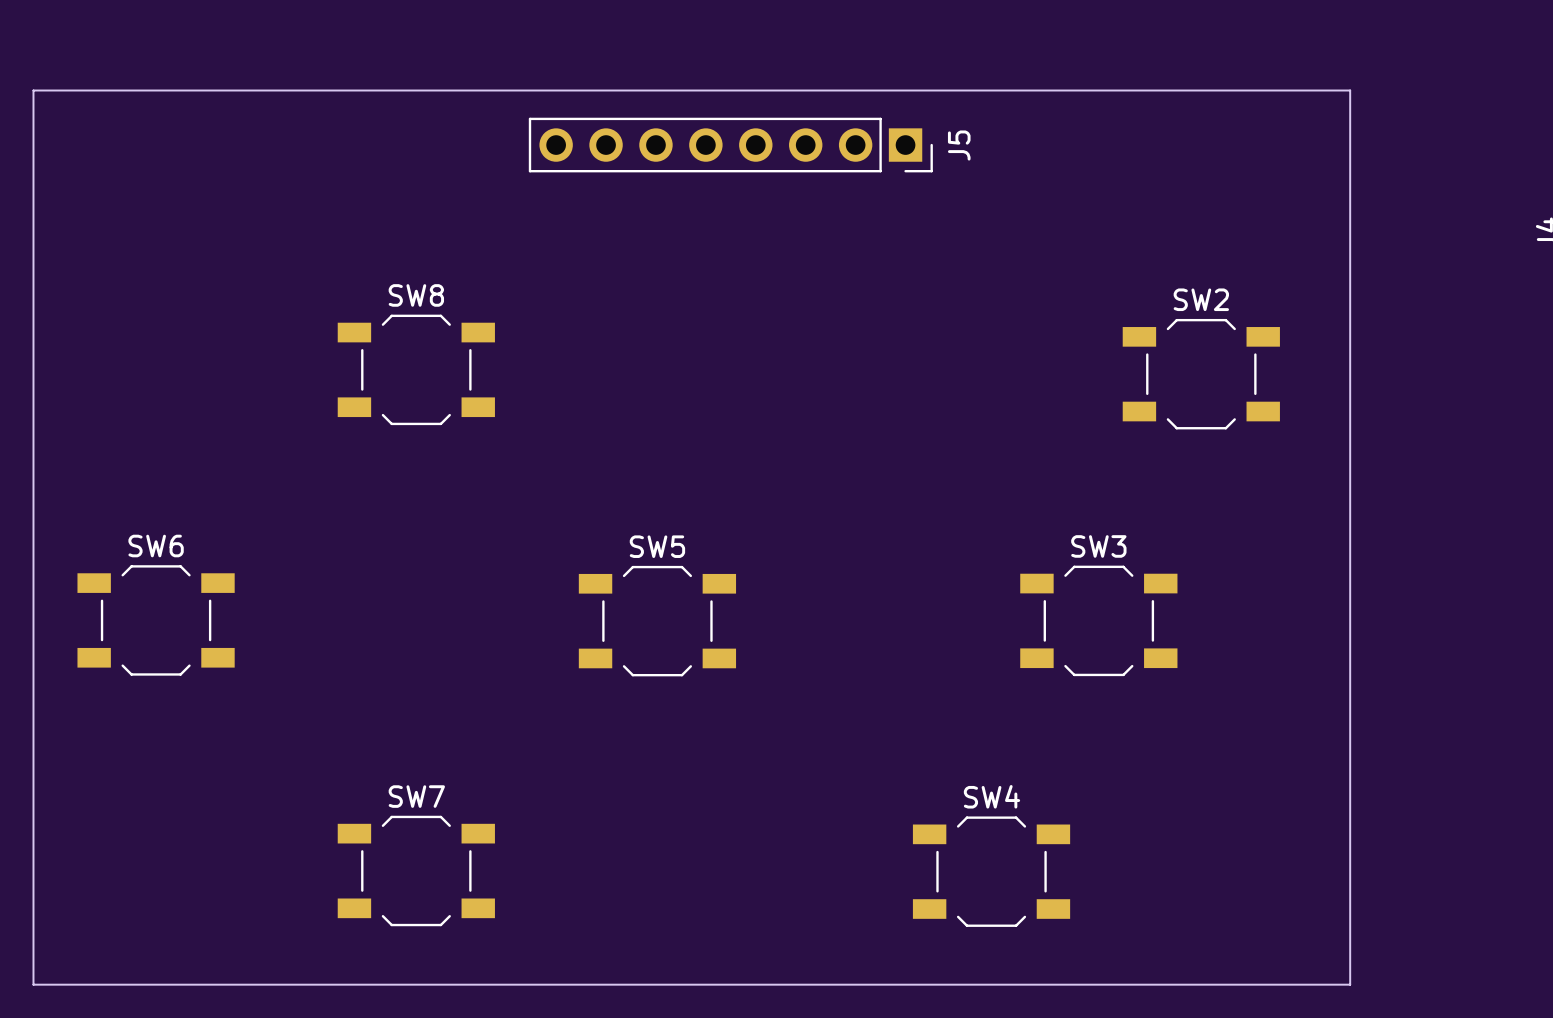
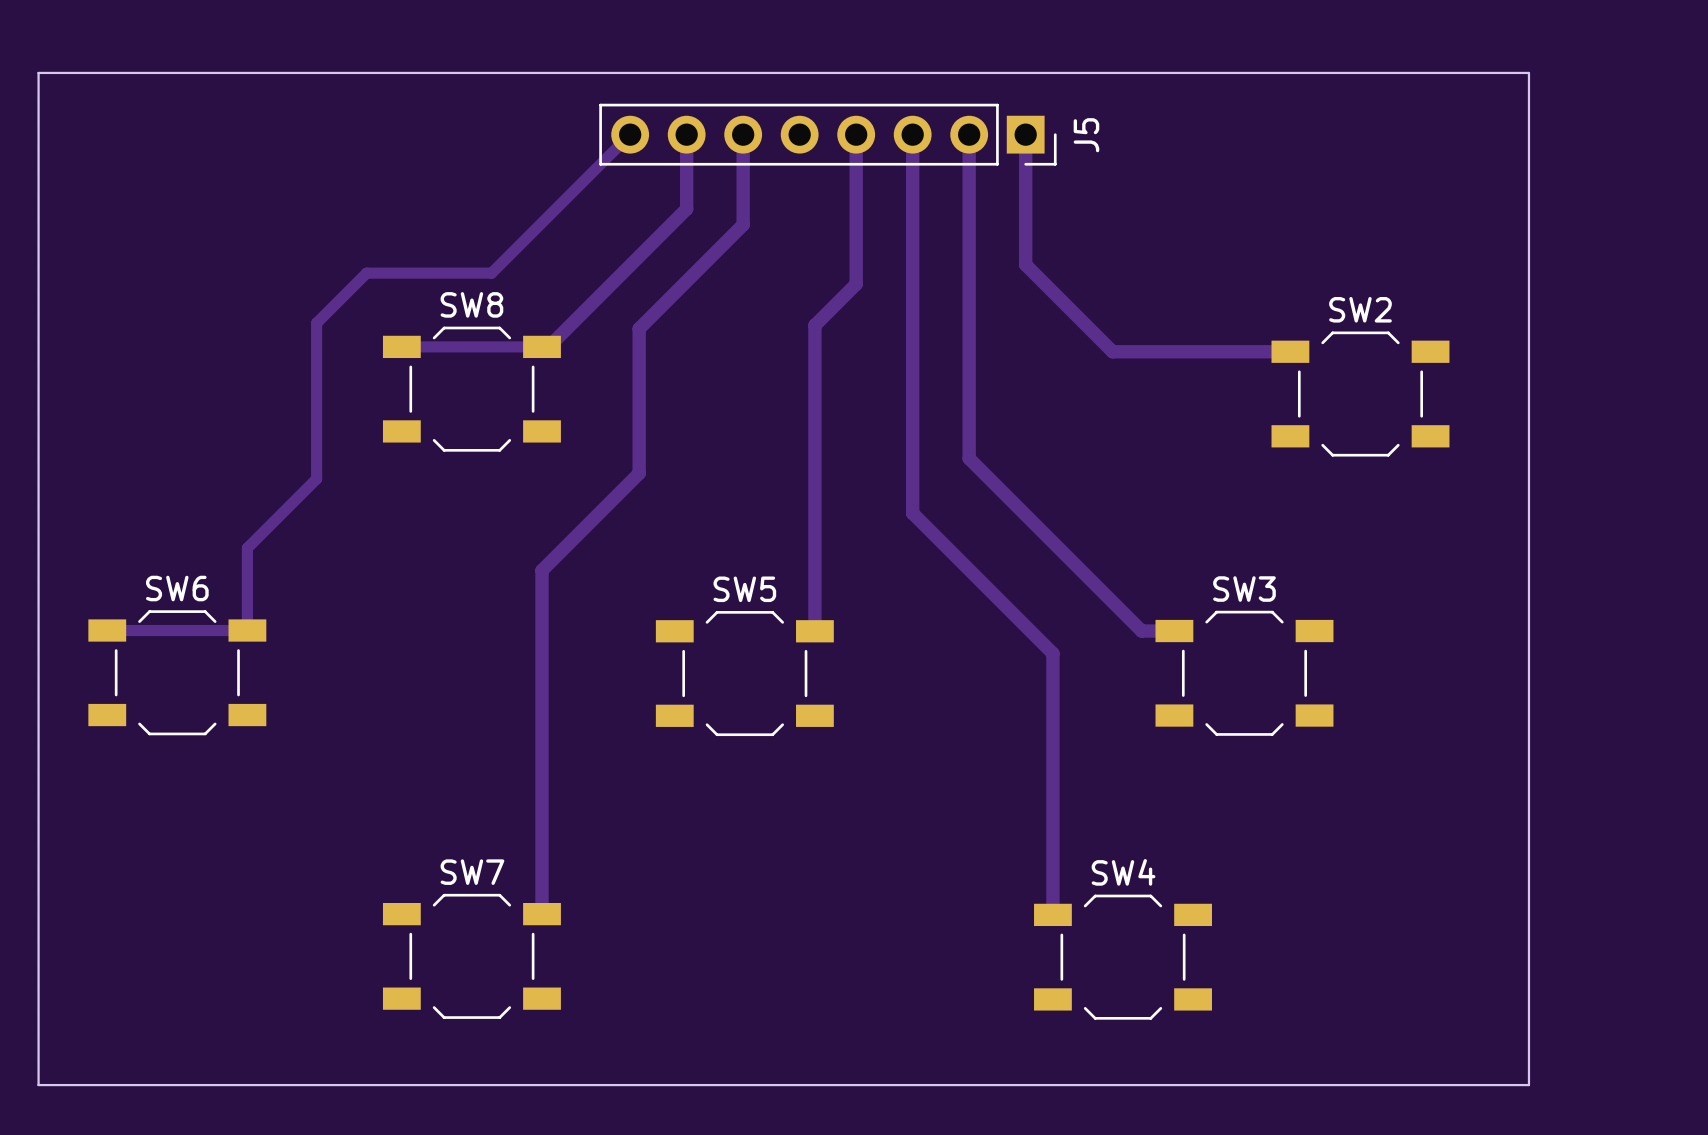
track: none -> (630, 134) (491, 273) (366, 273) (316, 323) (316, 478) (247, 548) (247, 630) (107, 630)
track: none -> (686, 134) (686, 208) (548, 346) (401, 346)
track: none -> (743, 134) (743, 224) (639, 328) (639, 473) (542, 570) (542, 914)
track: none -> (856, 134) (856, 284) (814, 325) (814, 631)
track: none -> (912, 134) (912, 513) (1052, 653) (1052, 914)
track: none -> (969, 134) (969, 458) (1141, 631) (1174, 631)
track: none -> (1025, 134) (1025, 264) (1112, 351) (1290, 351)

